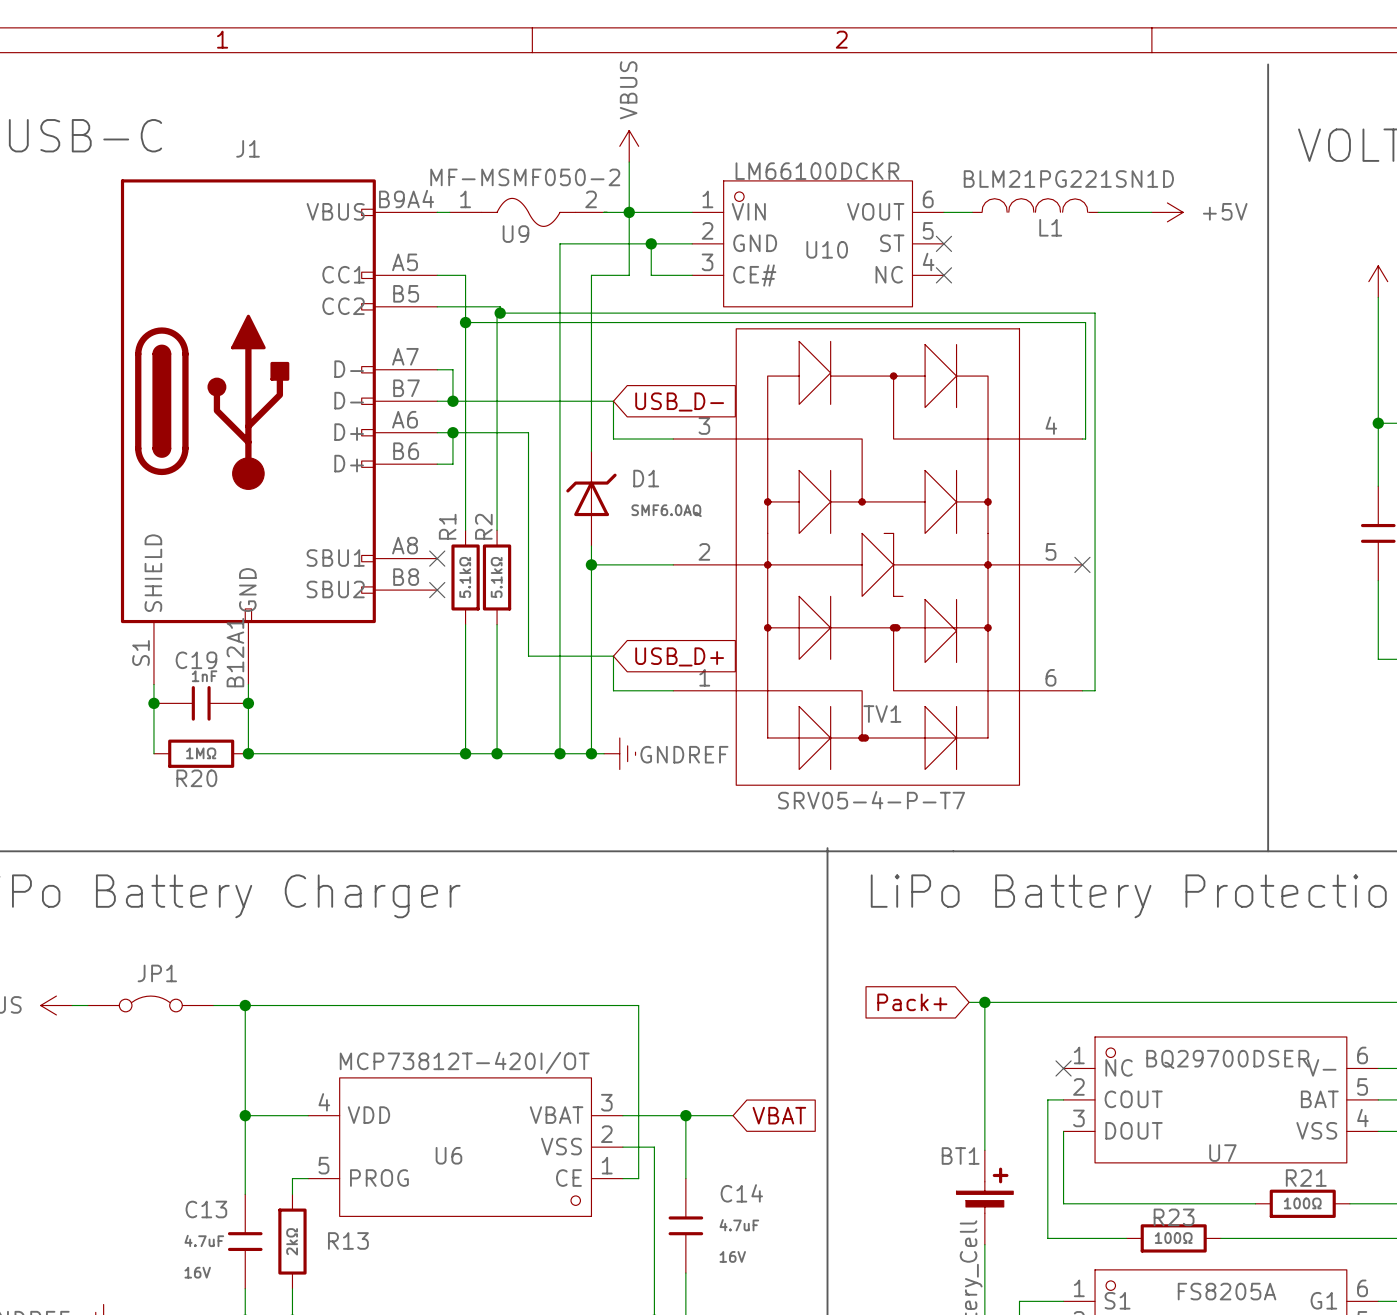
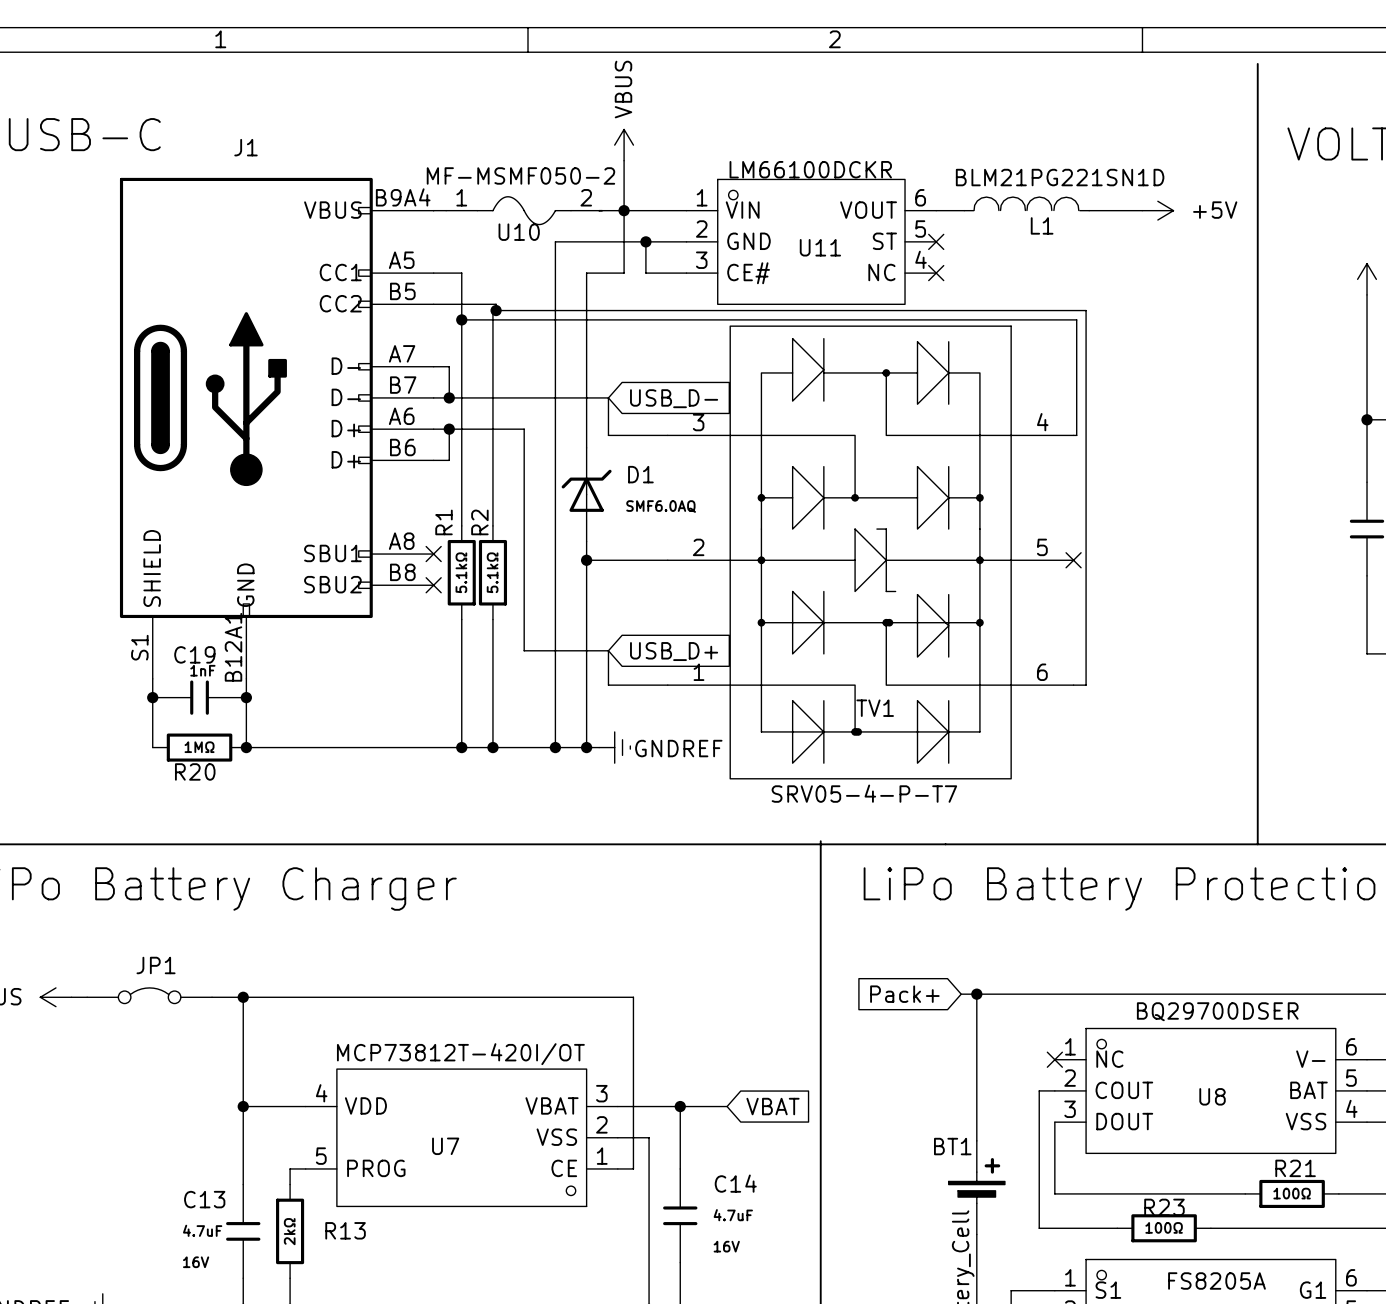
U9 name: U9 (515, 234) -> U10 (519, 232)
U10 name: U10 (827, 249) -> U11 (820, 247)
U7 value position: BQ29700DSER (1227, 1059) -> BQ29700DSER (1217, 1011)
U7 name: U7 (1222, 1153) -> U8 (1212, 1096)
U6 name: U6 (448, 1155) -> U7 (445, 1146)

